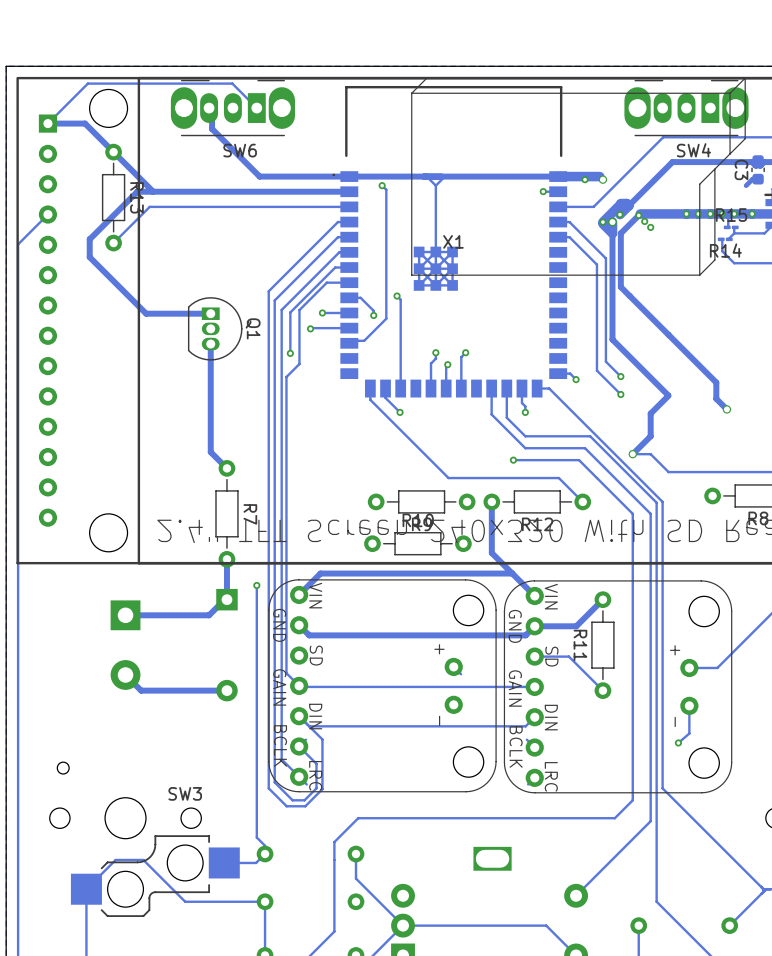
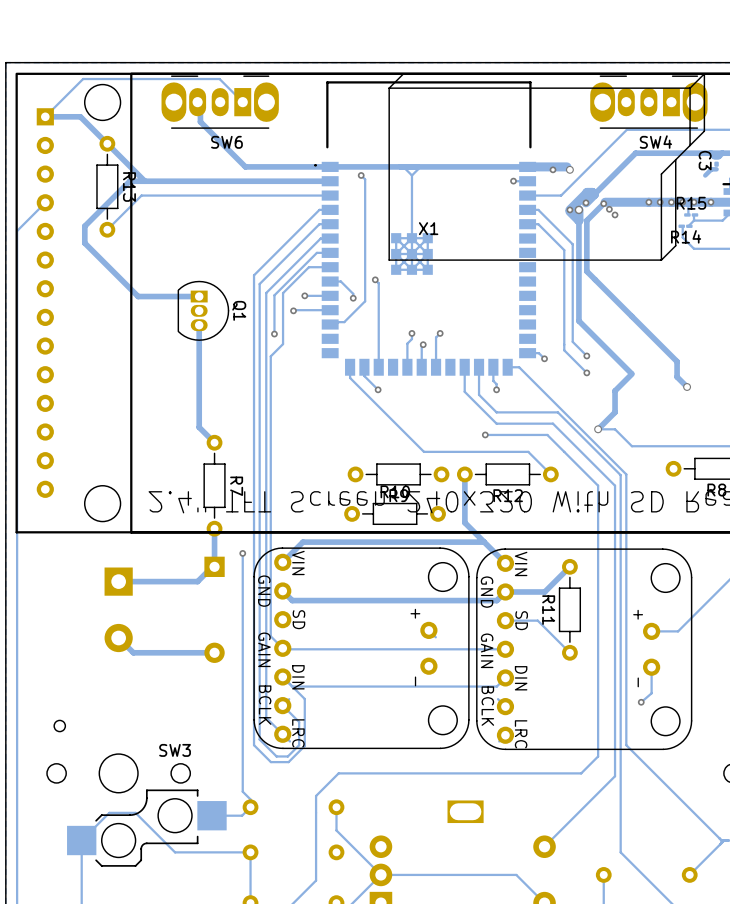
C3 footprint: [751, 155, 765, 185] -> [714, 154, 719, 167]

